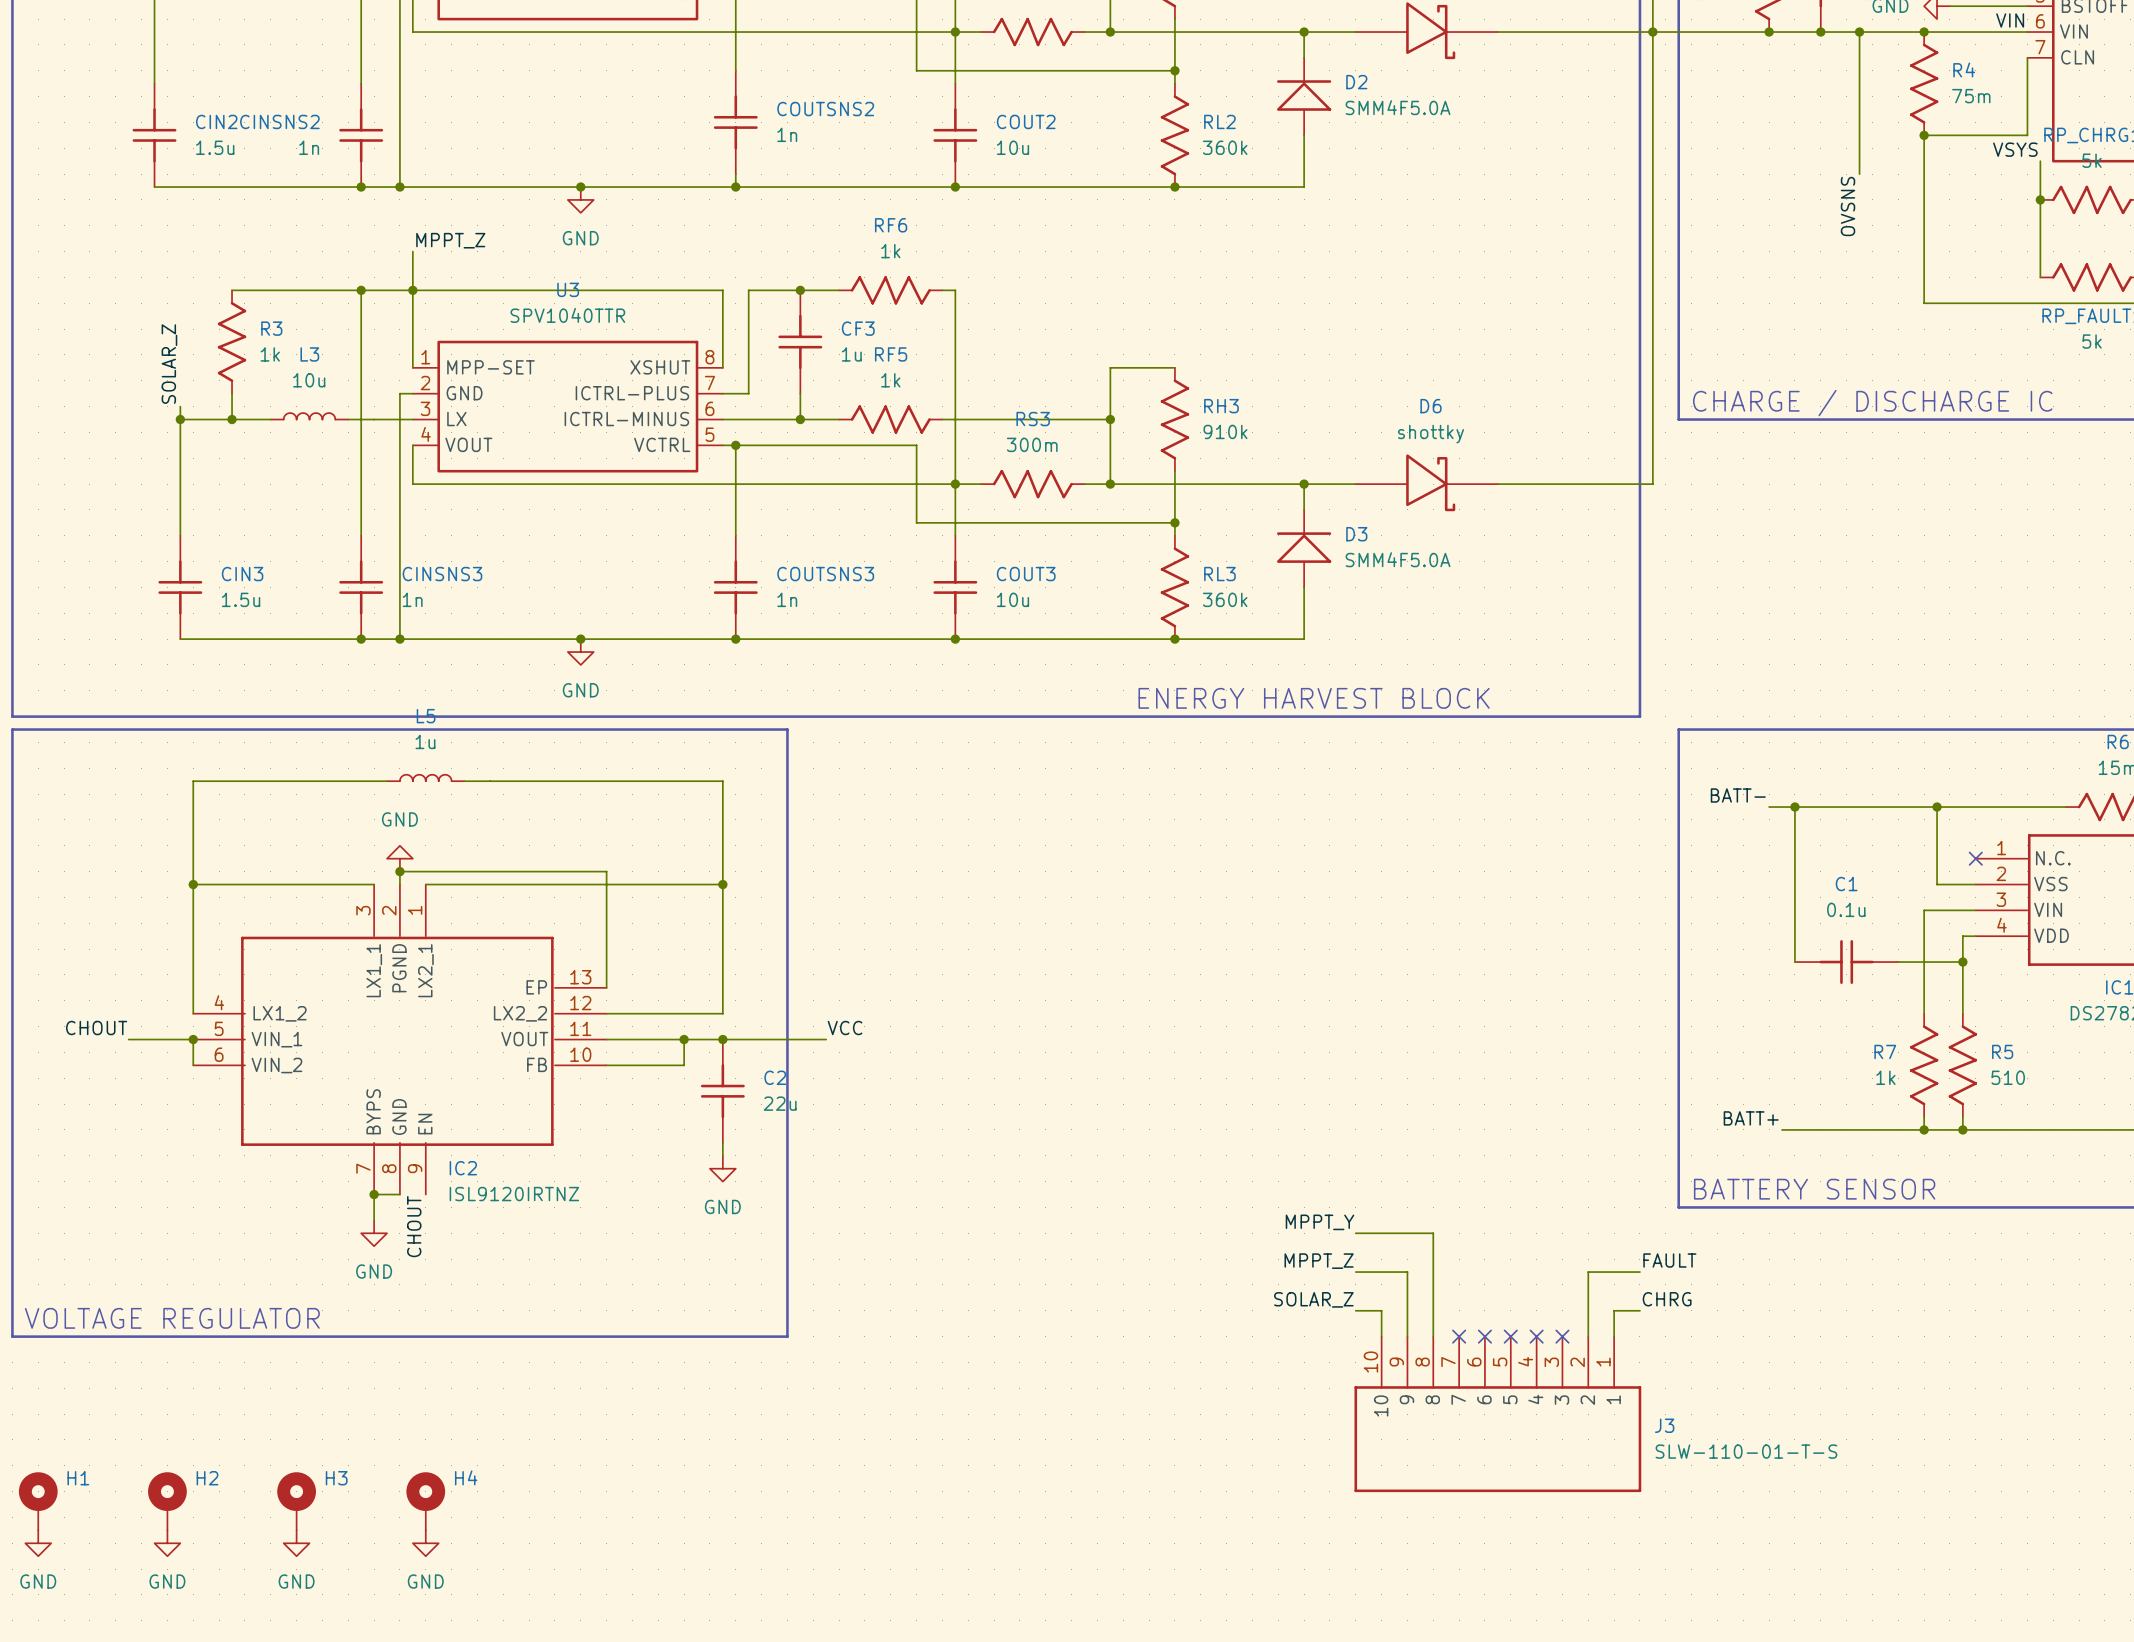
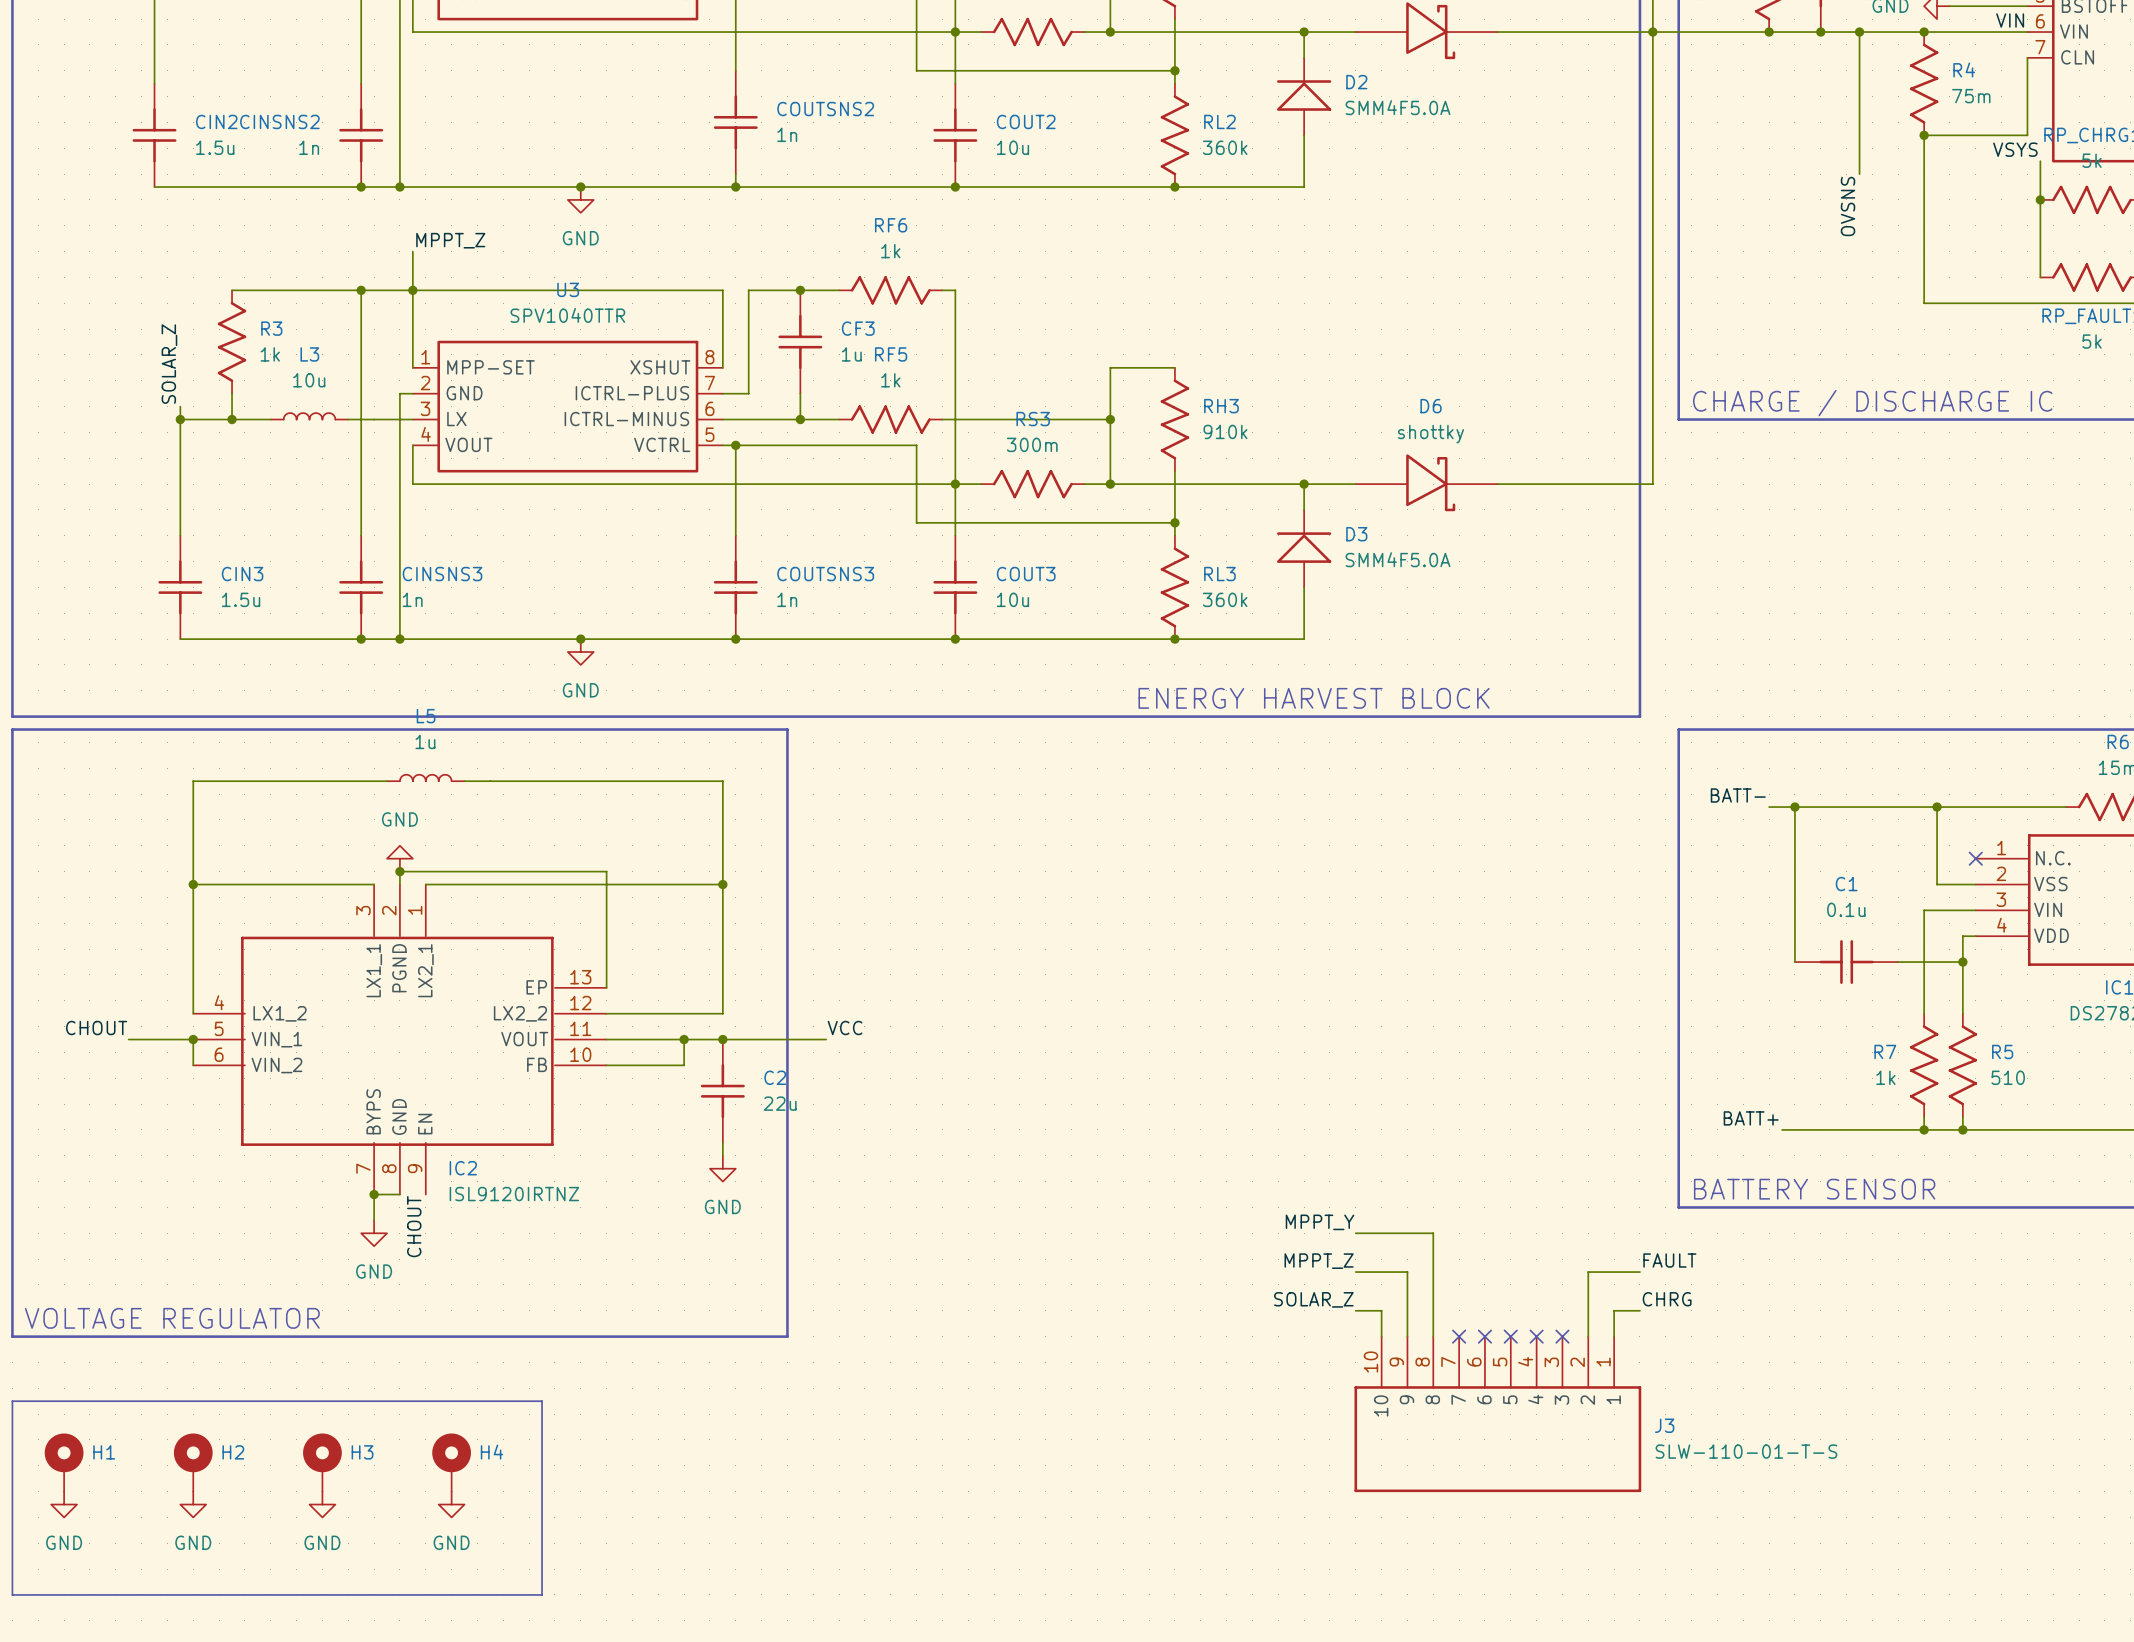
line: none -> (12, 1401) (12, 1594) (542, 1594) (542, 1401) (12, 1401)
H4 name position: H4 (466, 1477) -> H4 (491, 1452)
H1 name position: H1 (78, 1478) -> H1 (104, 1452)
H2 name position: H2 (207, 1478) -> H2 (233, 1452)
H3 name position: H3 (336, 1478) -> H3 (362, 1452)
H1 position: (38, 1501) -> (64, 1462)
H2 position: (167, 1501) -> (193, 1462)
H3 position: (296, 1501) -> (322, 1462)
H4 position: (425, 1501) -> (451, 1462)
power symbol position: GND (38, 1543) -> GND (64, 1504)
power symbol position: GND (167, 1543) -> GND (193, 1504)
power symbol position: GND (296, 1543) -> GND (322, 1504)
power symbol position: GND (425, 1543) -> GND (451, 1504)

